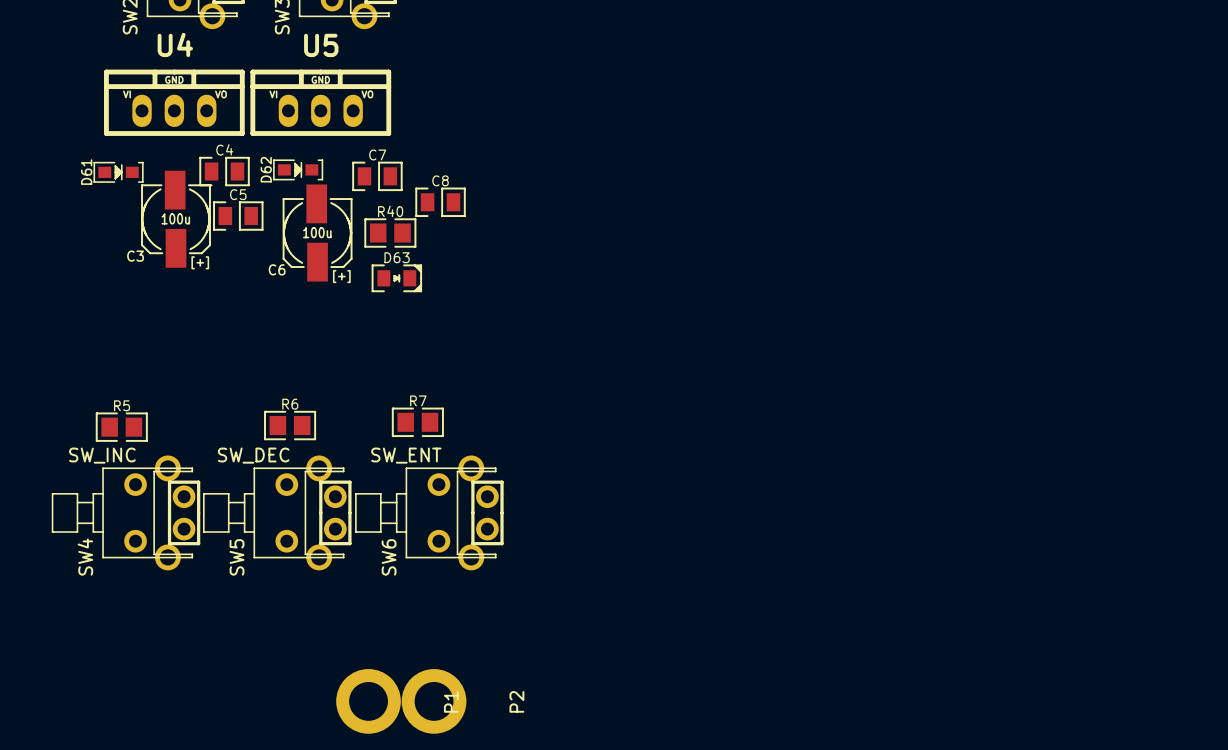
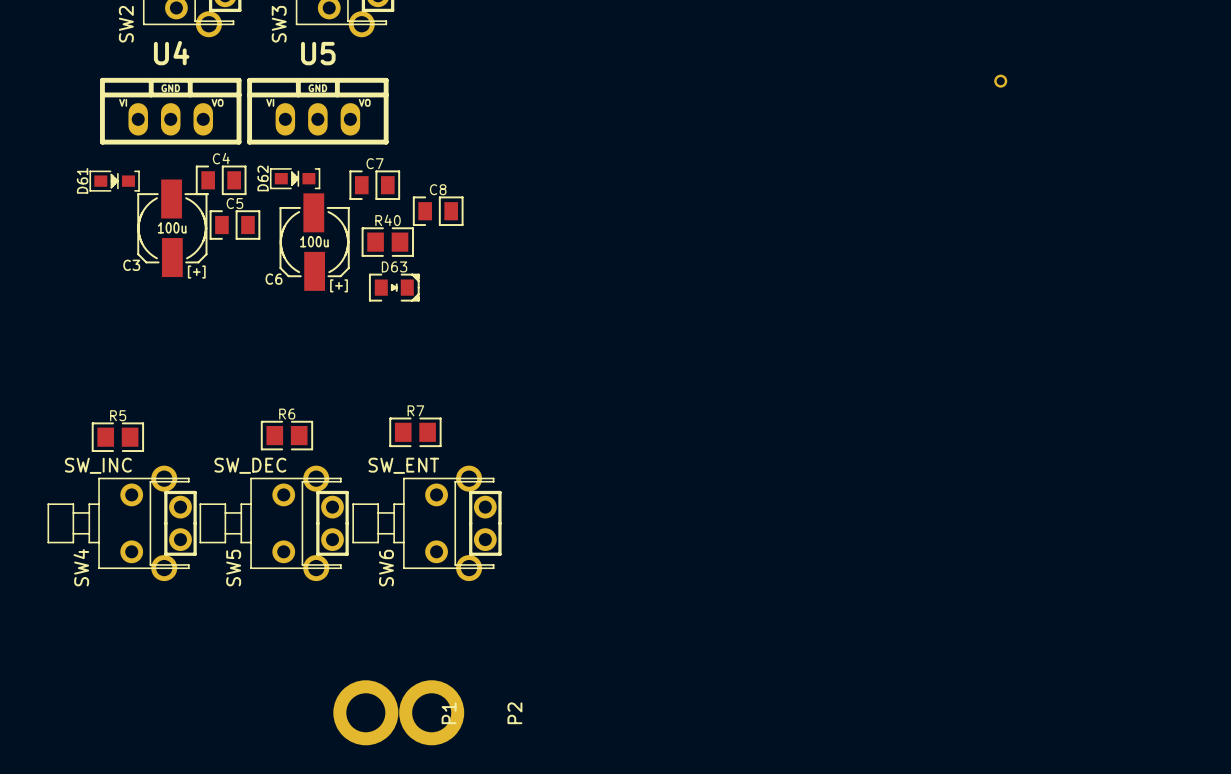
part: none -> (1000, 81)

